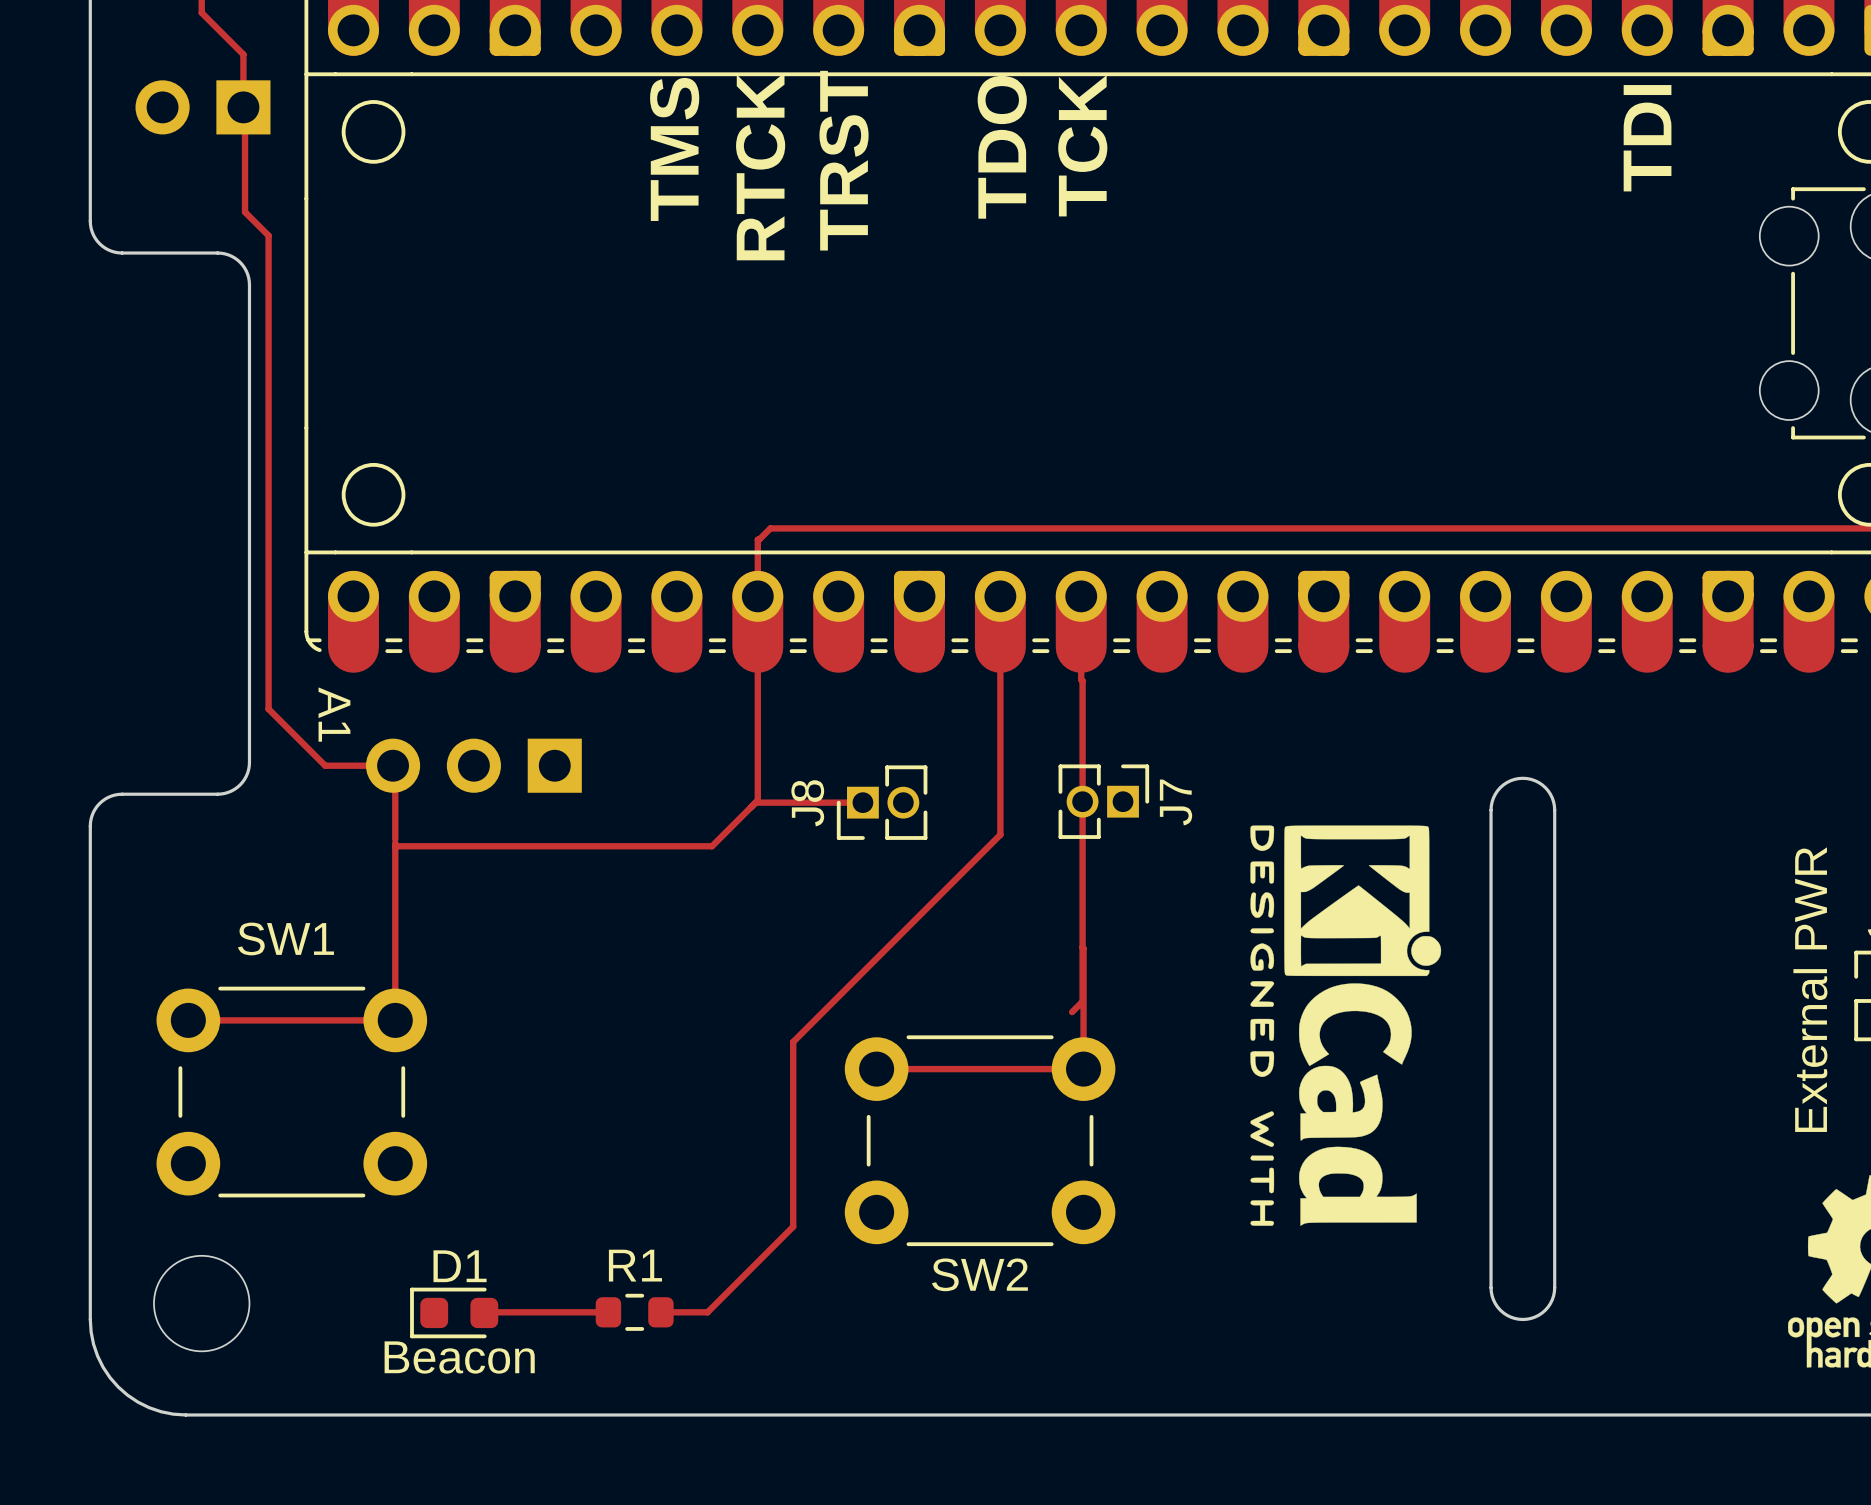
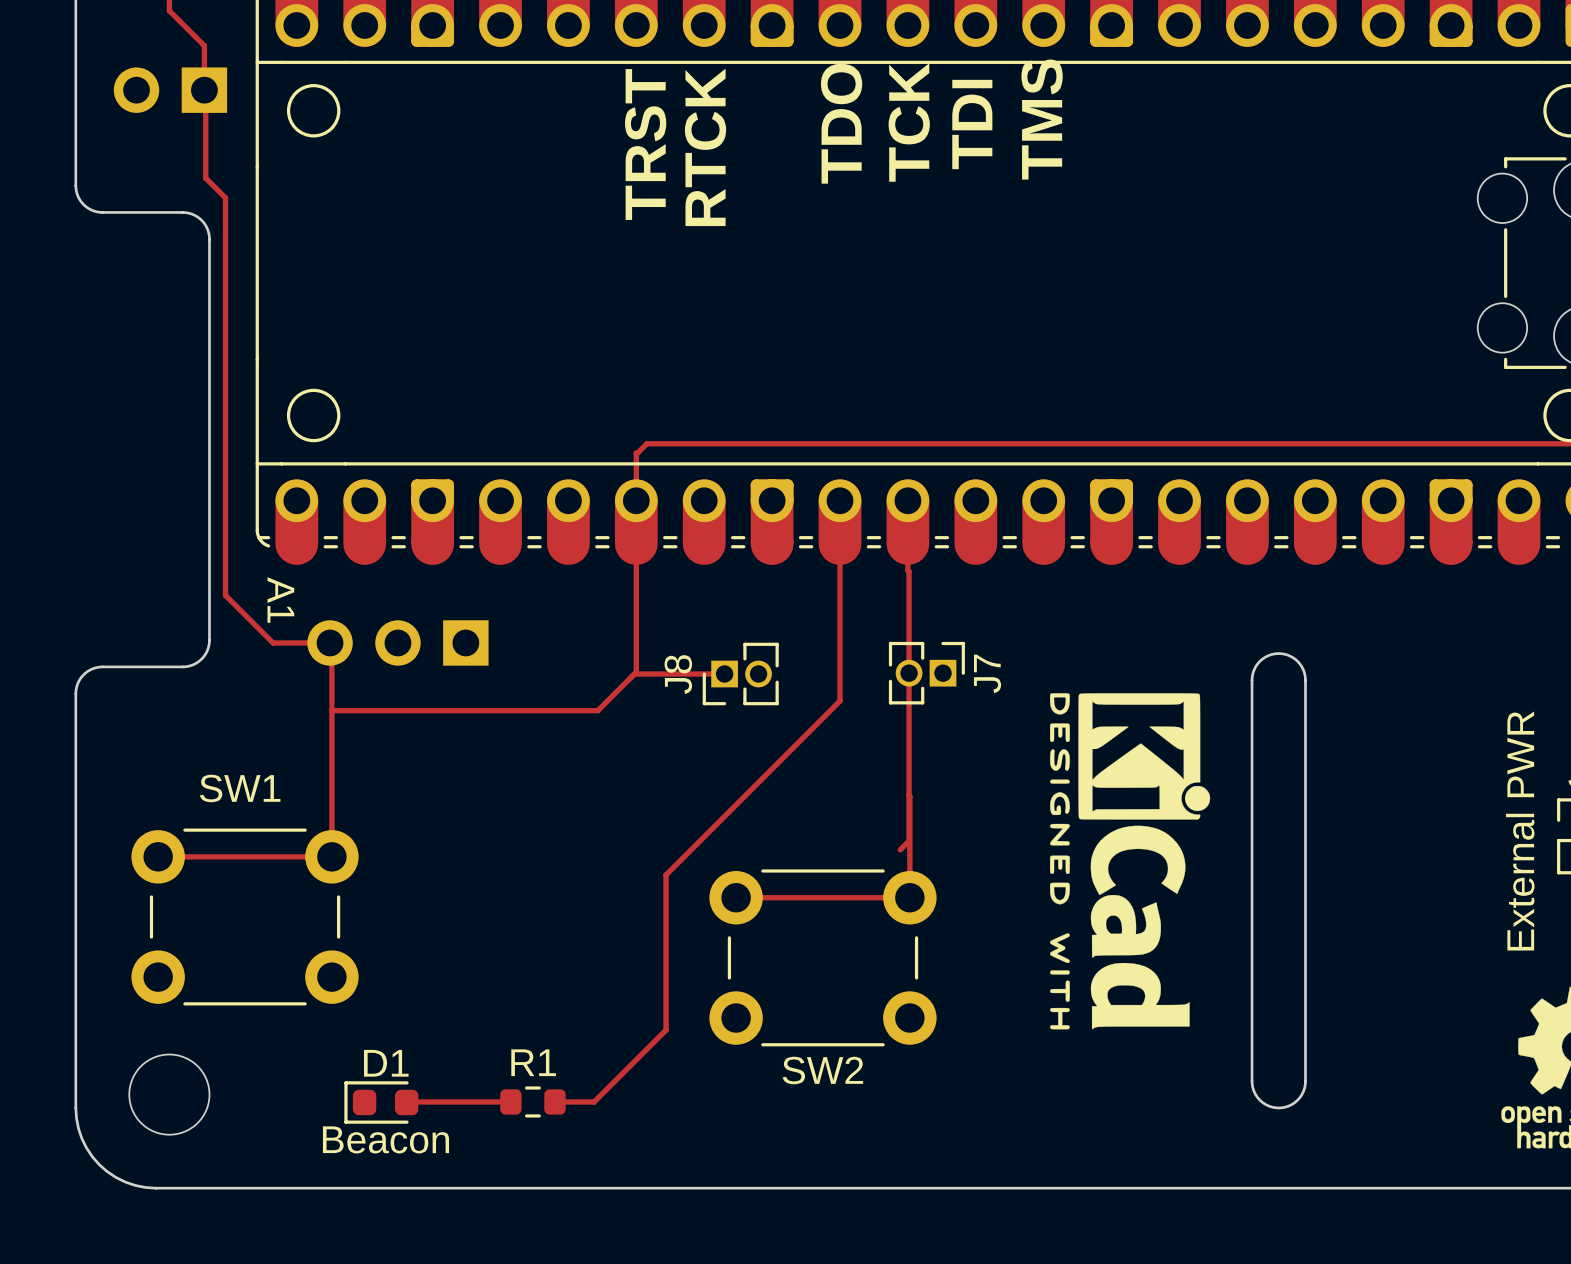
text position: TDI (1647, 138) -> TDI (972, 124)
text position: TMS (674, 149) -> TMS (1042, 119)
text position: TRST (844, 160) -> TRST (645, 144)
text position: RTCK (760, 166) -> RTCK (705, 147)

